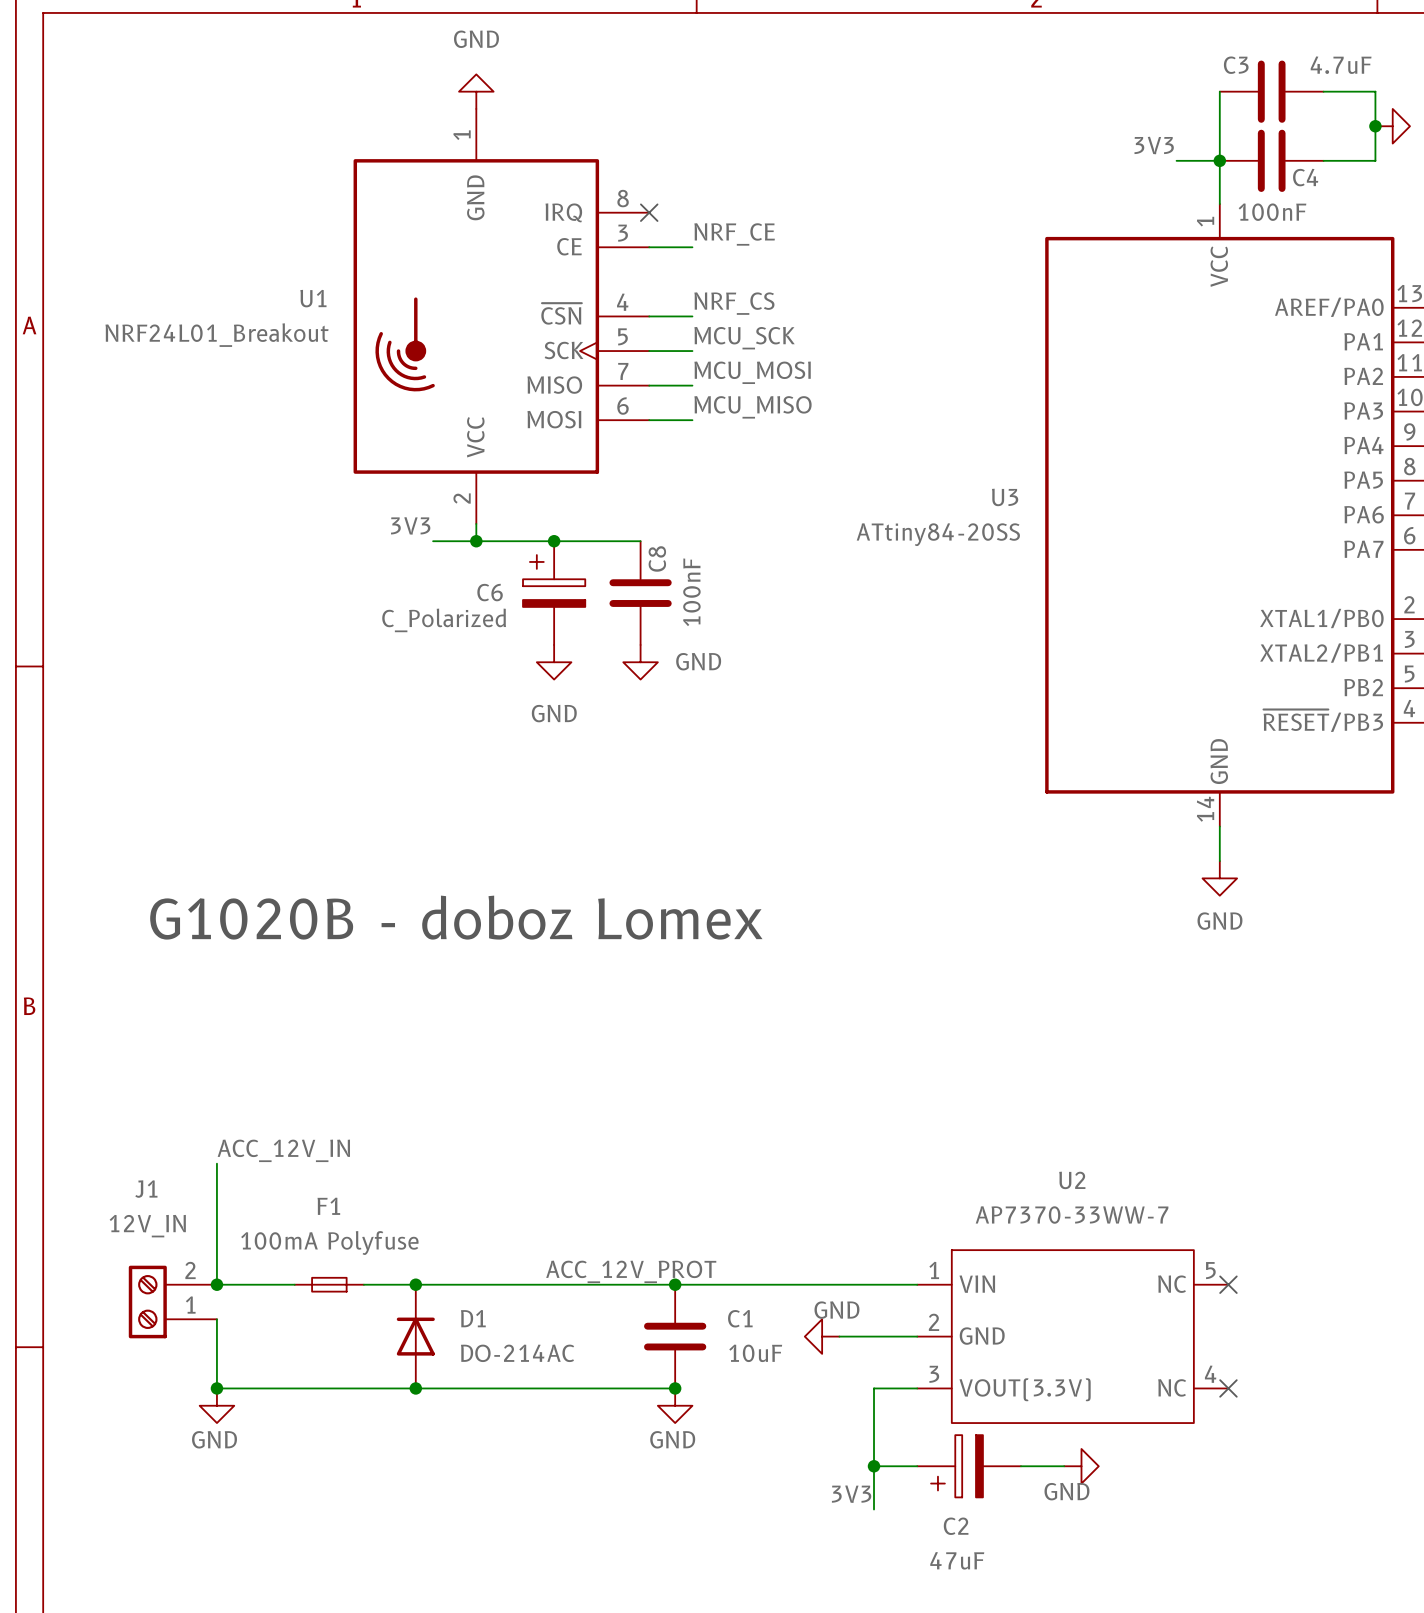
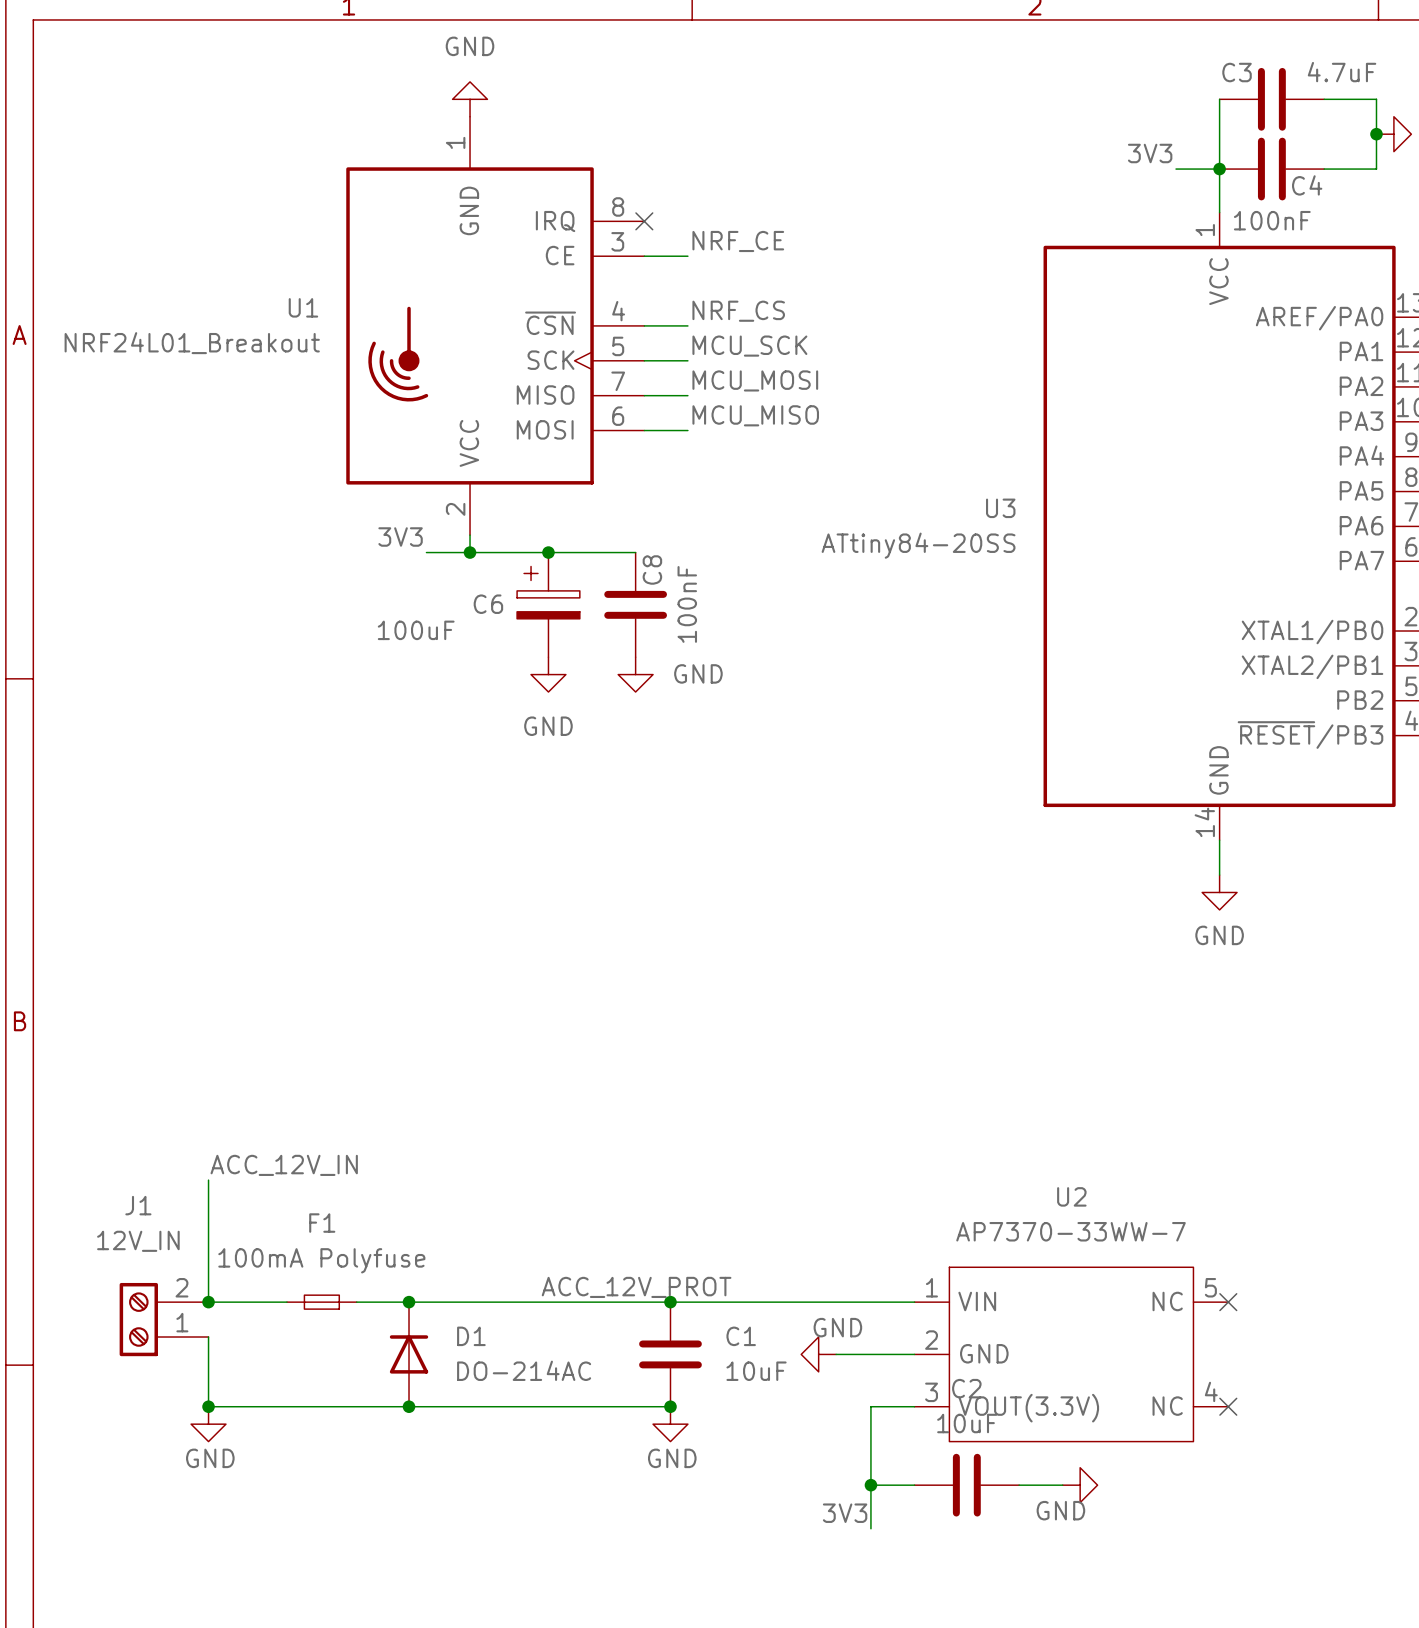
C6 value: C_Polarized (444, 620) -> 100uF (416, 630)
text: G1020B - doboz Lomex (456, 917) -> none
C2 symbol: [917, 1435, 1021, 1498] -> [914, 1453, 1020, 1517]
C2 name position: C2 (956, 1526) -> C2 (966, 1388)
C2 value: 47uF (957, 1560) -> 10uF (967, 1423)

